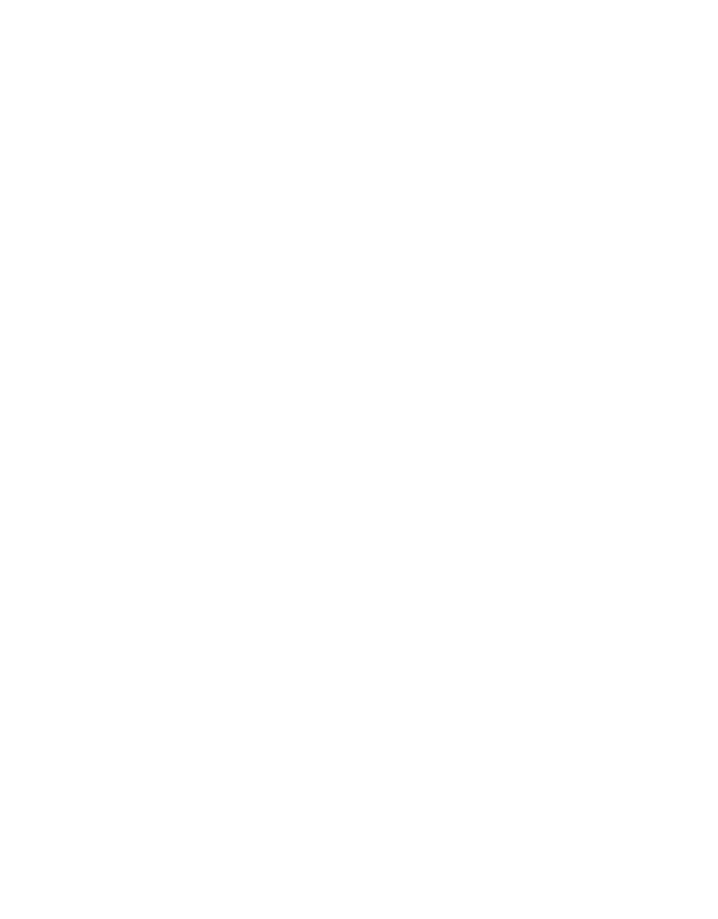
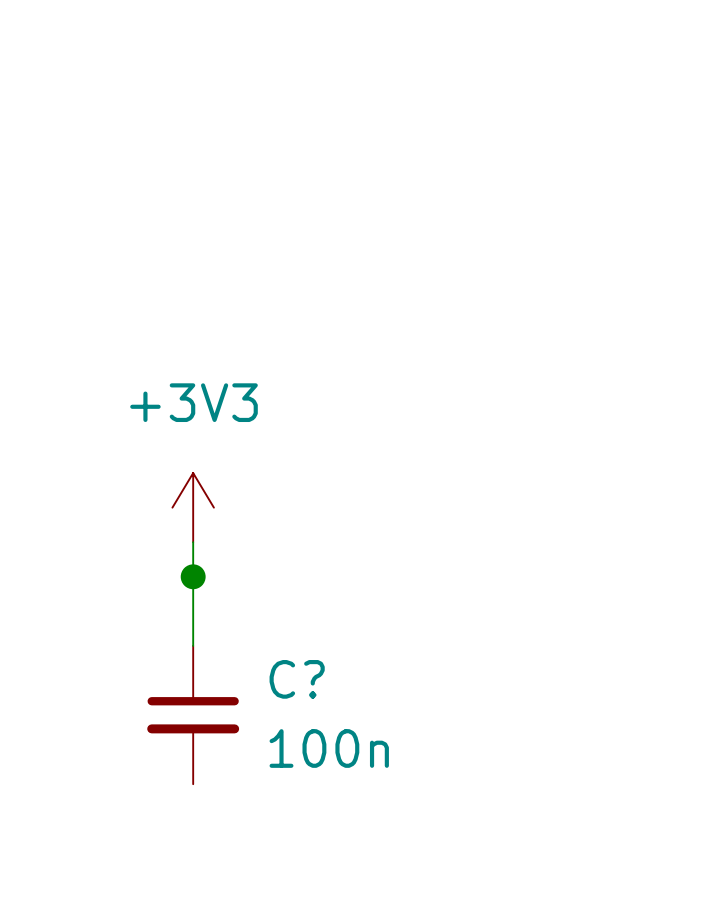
power symbol: none -> +3V3 (193, 507)
wire: none -> (193, 542) (193, 645)
junction: none -> (193, 576)
C?: none -> 100n (193, 715)

